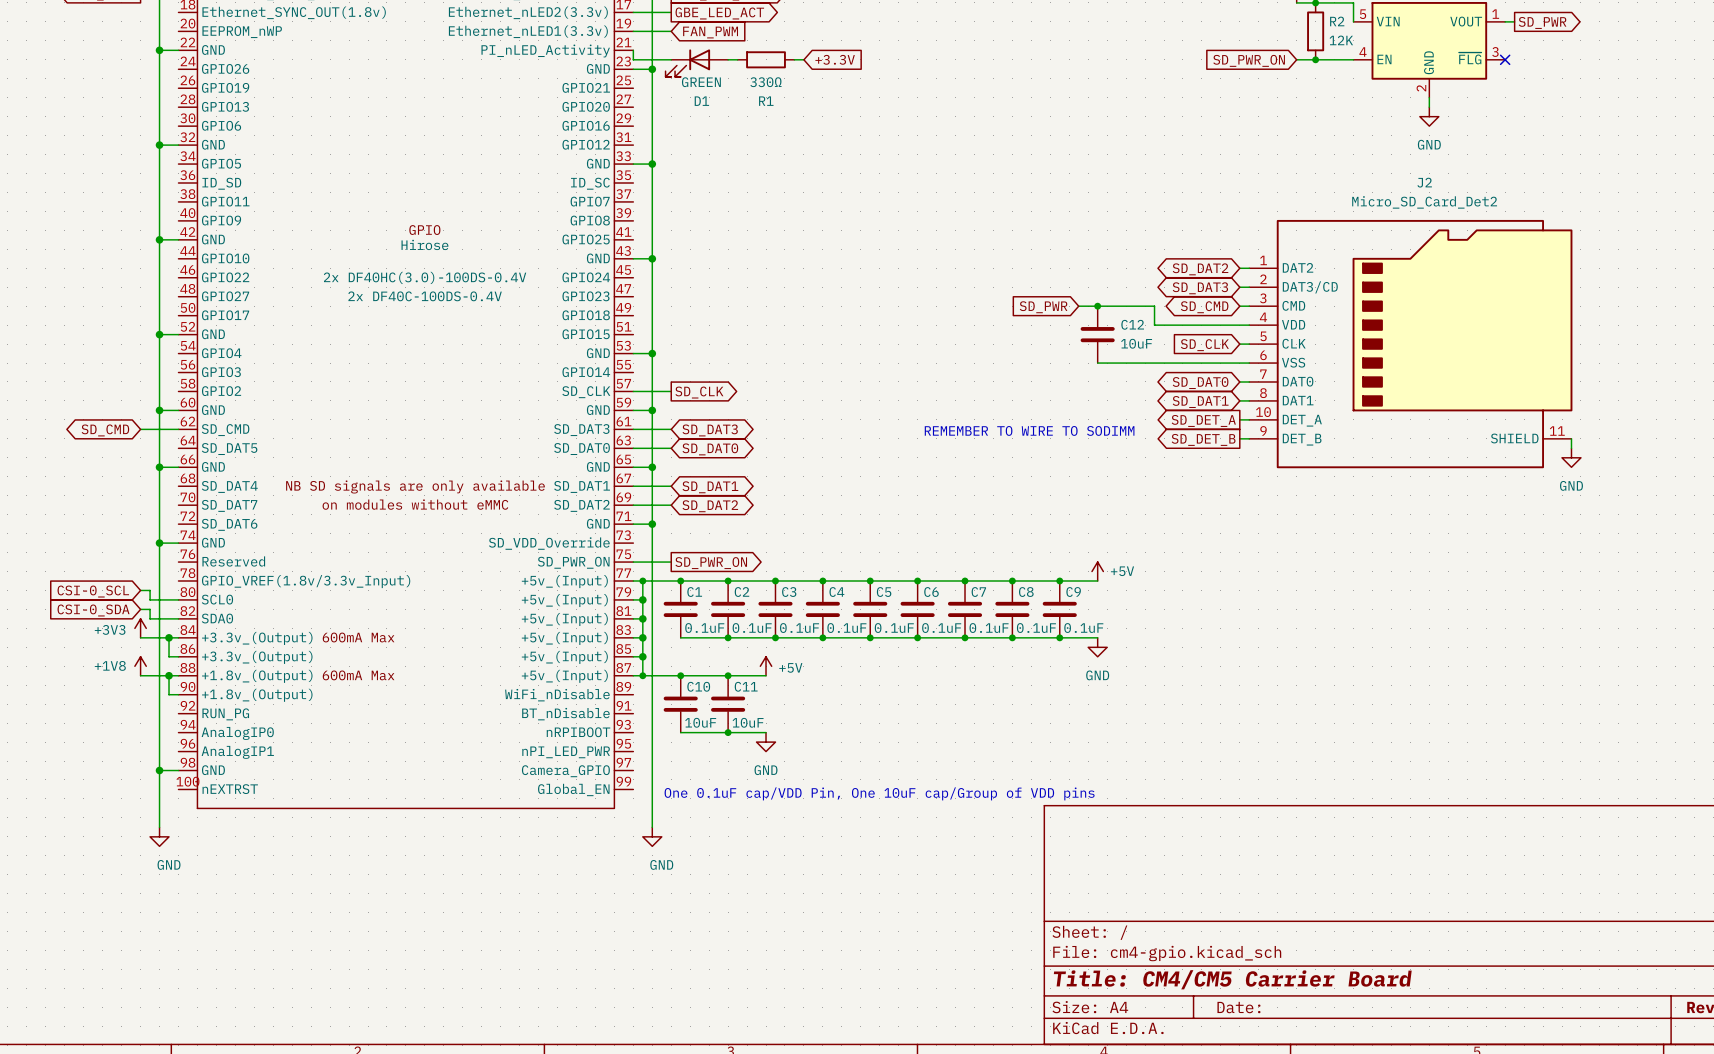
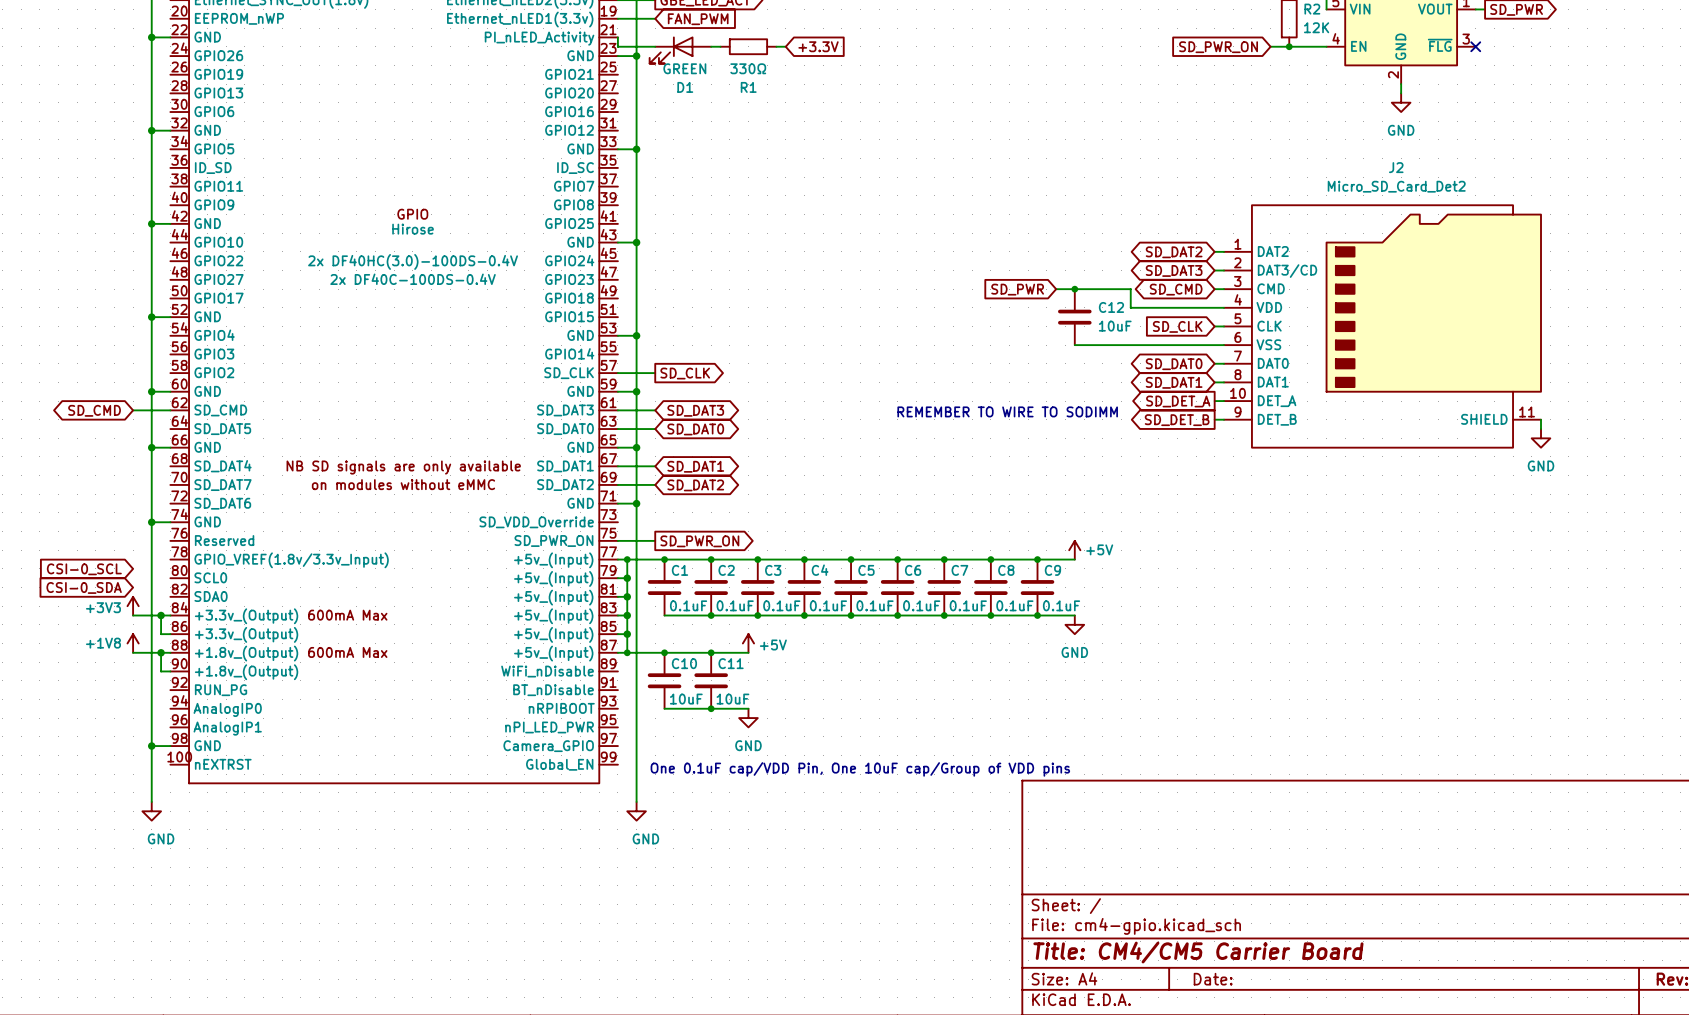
wire: (140, 590) (150, 590) (150, 599) (178, 599) -> none
wire: (140, 609) (150, 609) (150, 618) (178, 618) -> none

